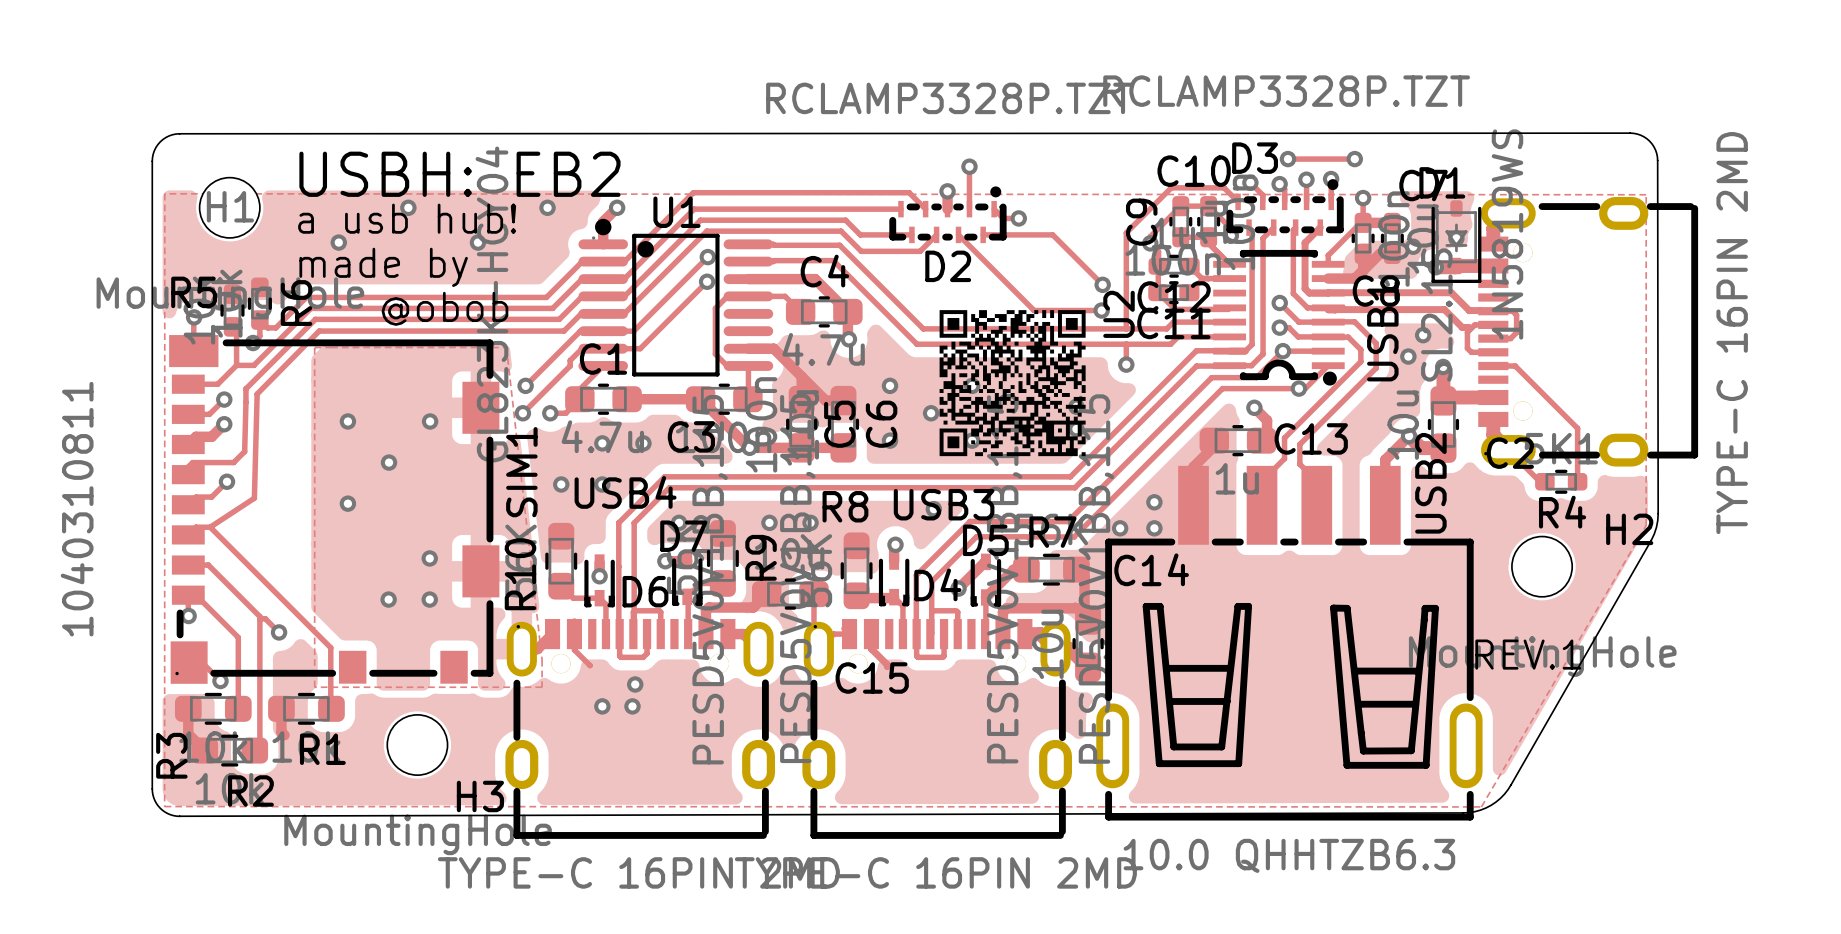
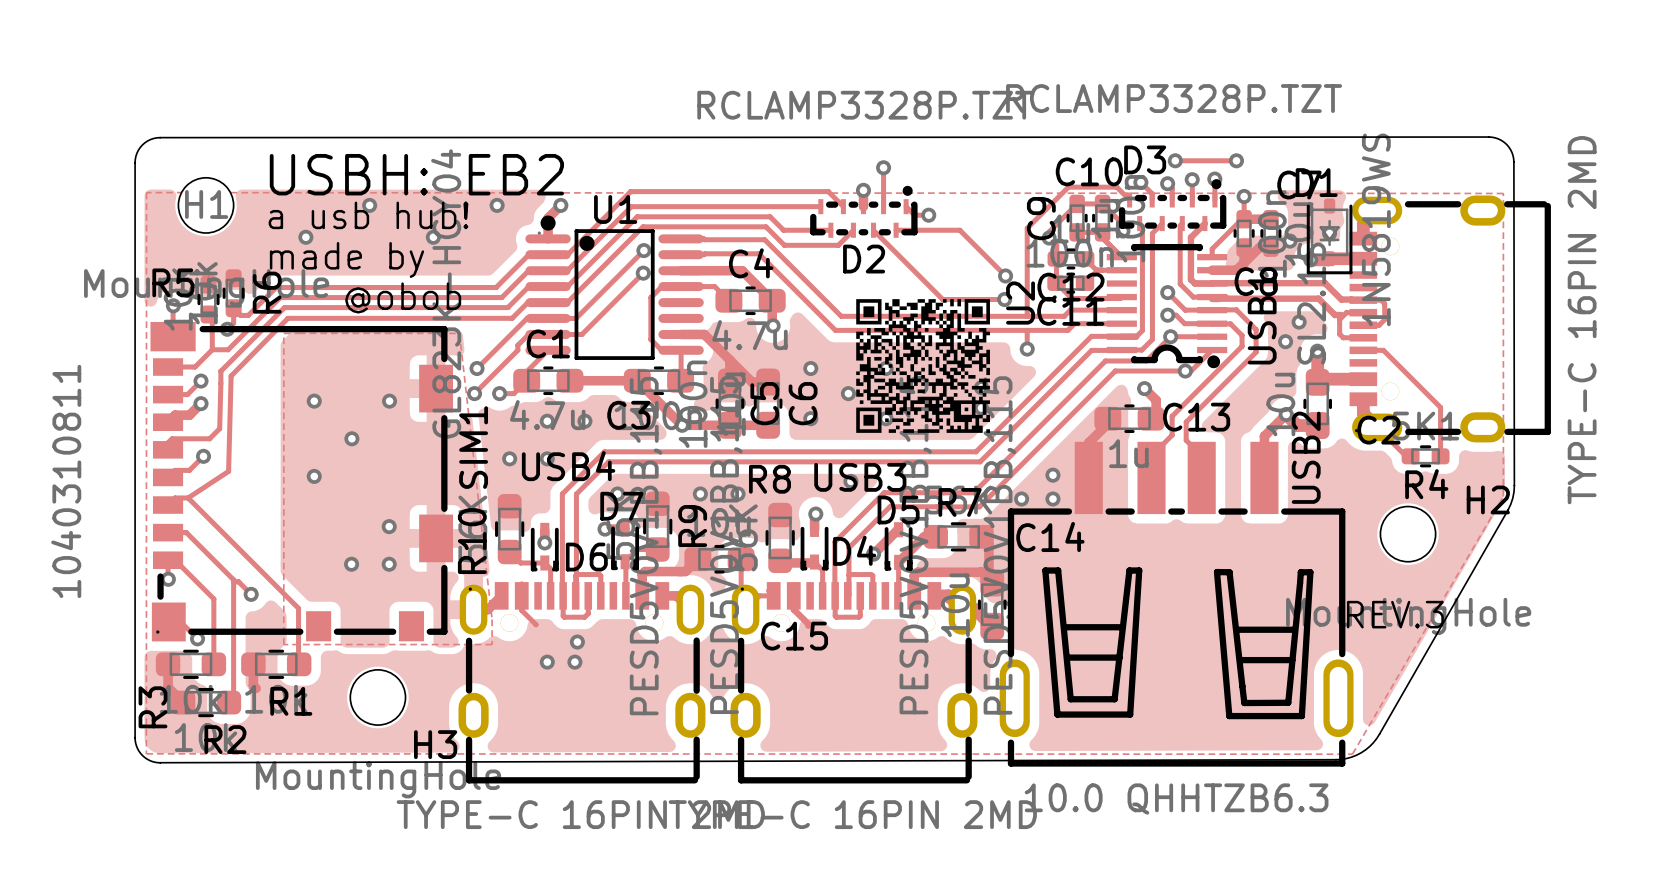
text: REV.1 (1528, 654) -> REV.3 (1395, 614)

